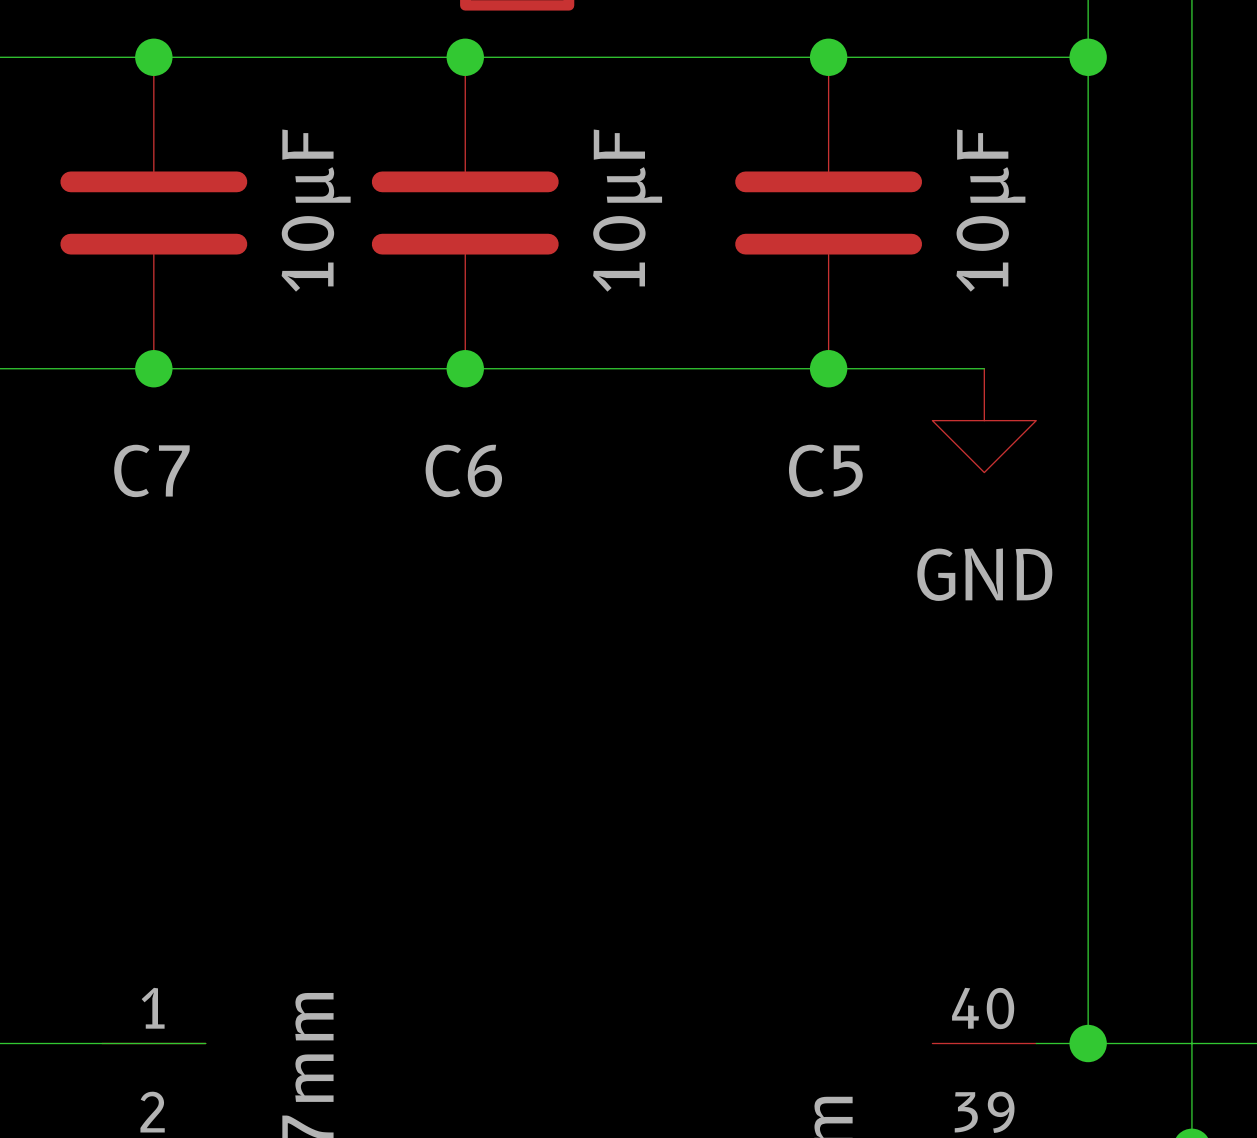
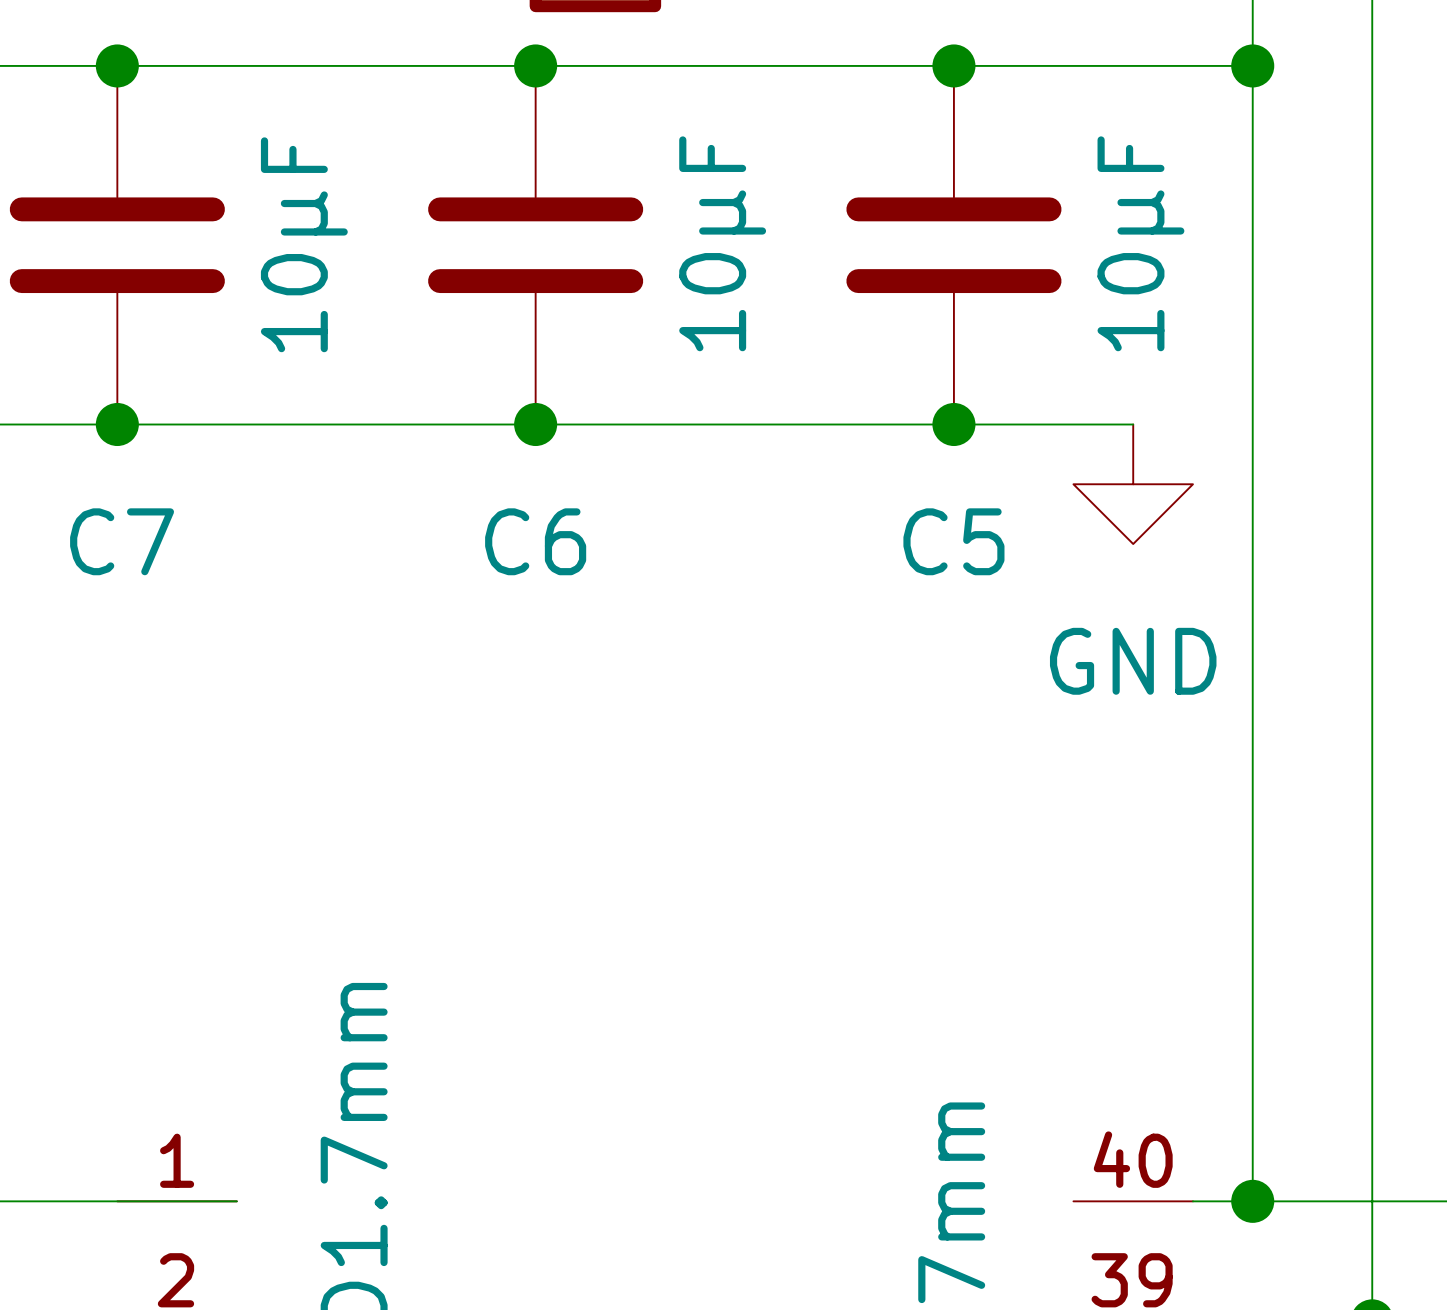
junction position: (153, 57) -> (117, 65)
C7 value position: 10µF (316, 210) -> 10µF (304, 244)
C7 position: (153, 213) -> (117, 245)
junction position: (153, 368) -> (117, 424)
C7 name position: C7 (151, 470) -> C7 (122, 541)

